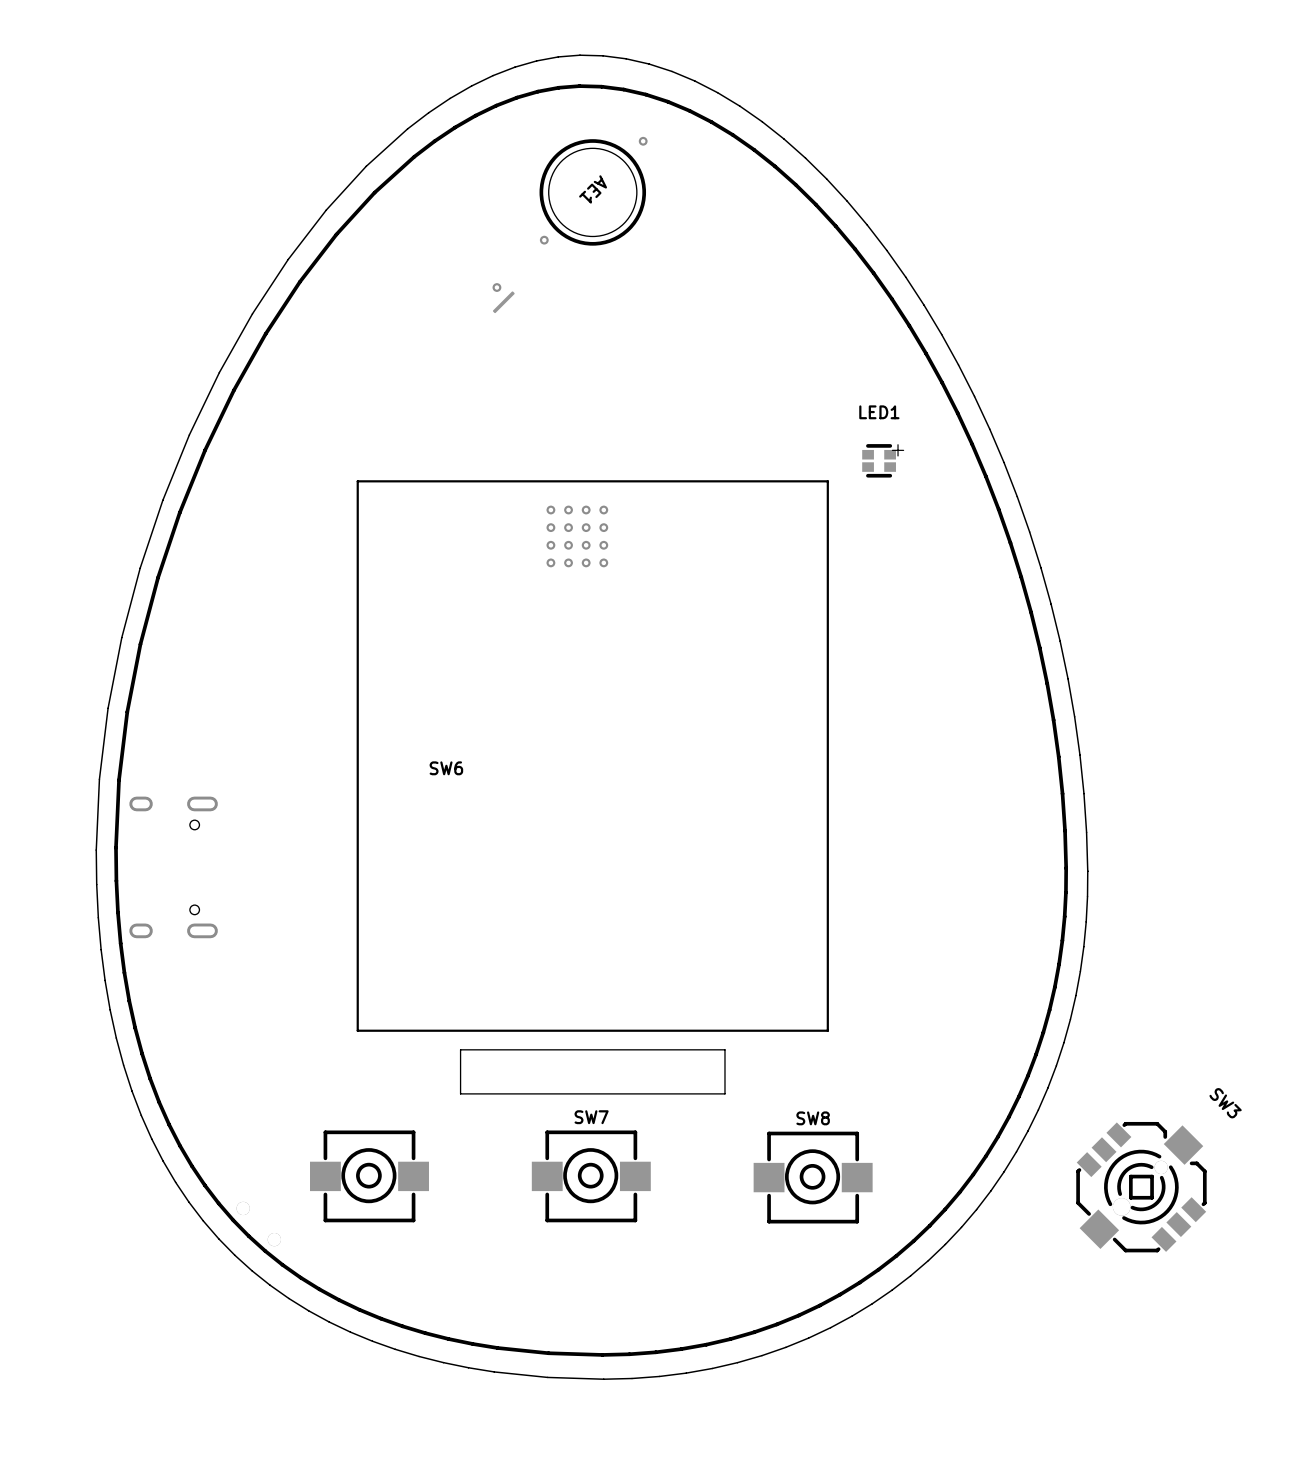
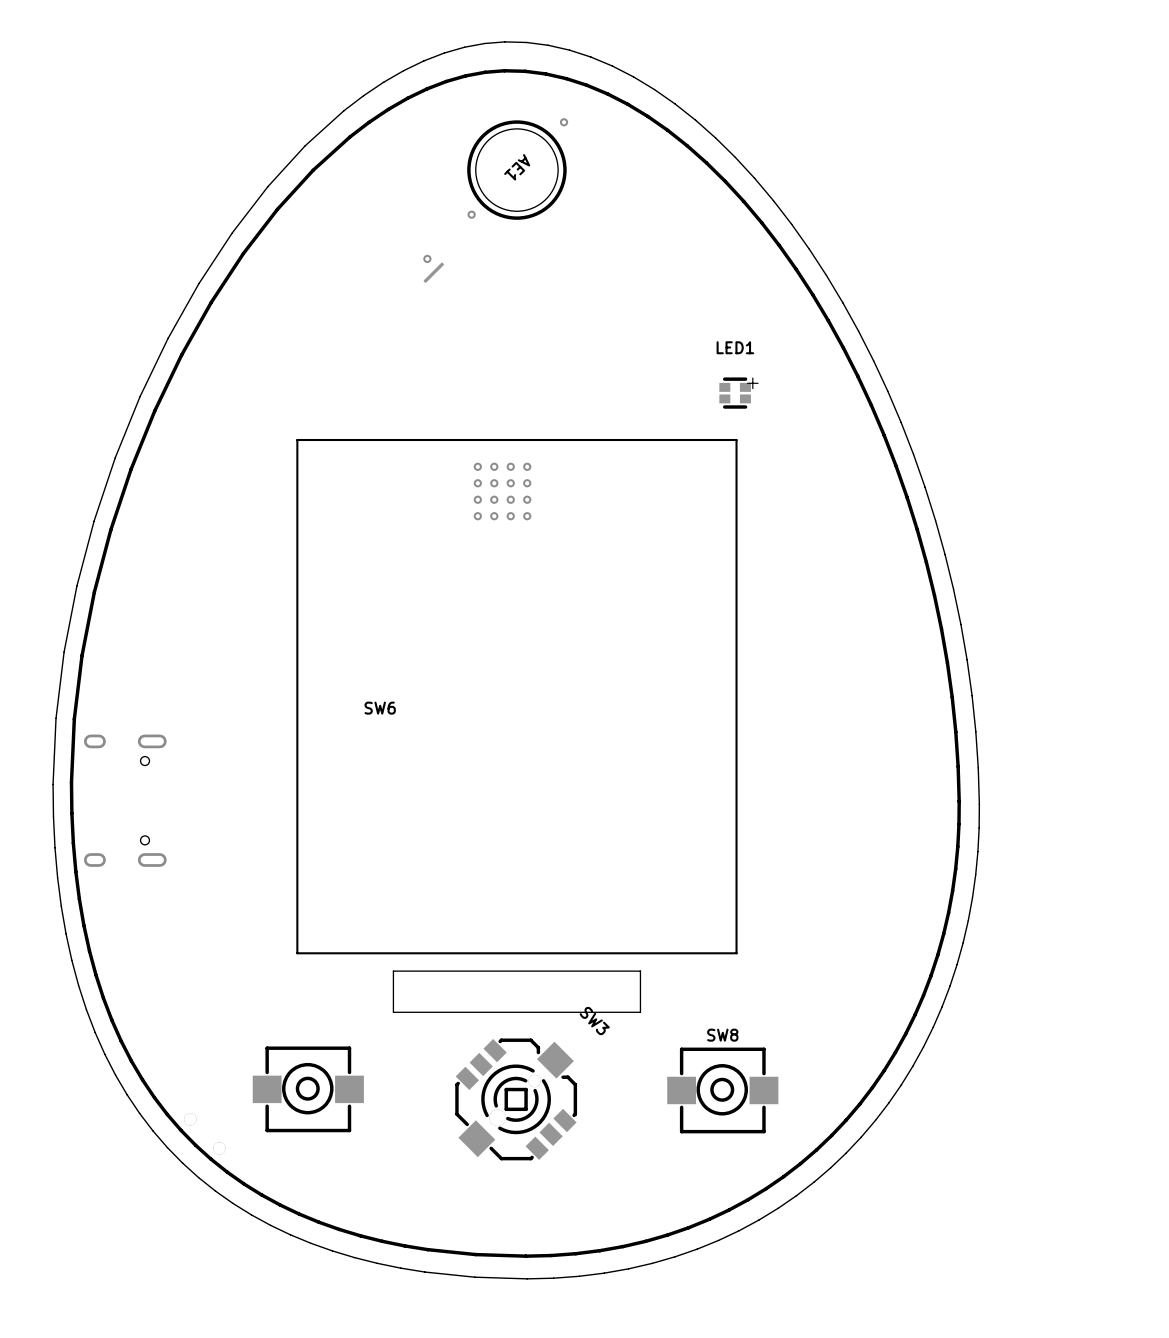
LED1 position: (879, 460) -> (735, 393)
SW7: (591, 1176) -> none
SW3 position: (1141, 1187) -> (516, 1099)

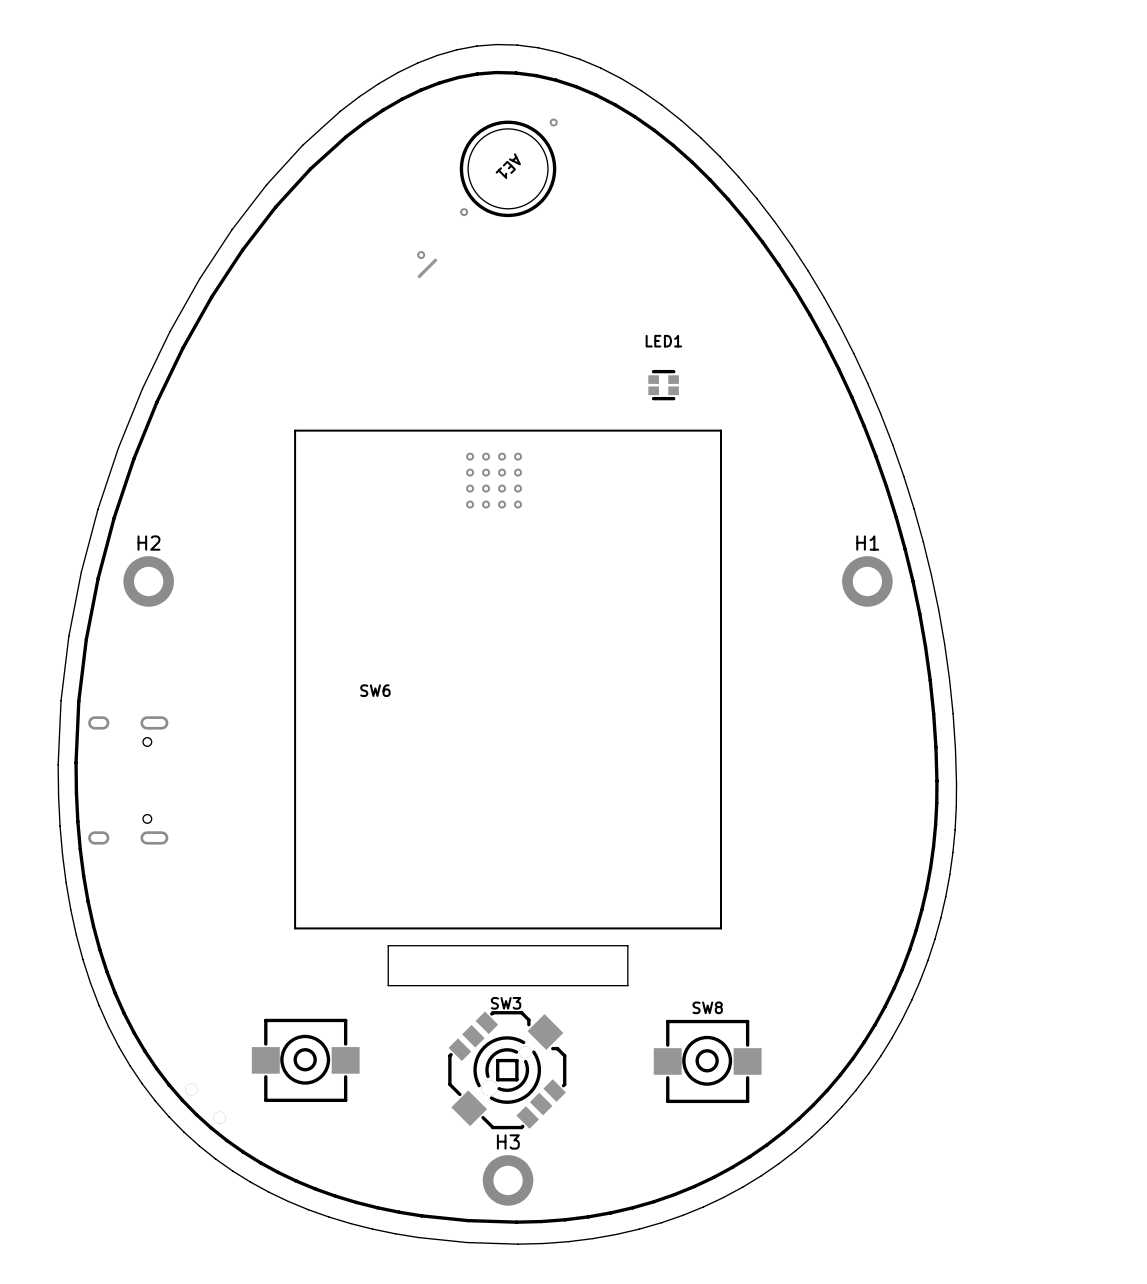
LED1 text: + (752, 383) -> none
LED1 position: (735, 393) -> (663, 385)
H2: none -> (148, 581)
H1: none -> (867, 581)
SW3 name rotation: 0° (594, 1021) -> 45° counterclockwise (506, 1003)
SW3 name position: SW3 (594, 1021) -> SW3 (506, 1003)
H3: none -> (508, 1180)

